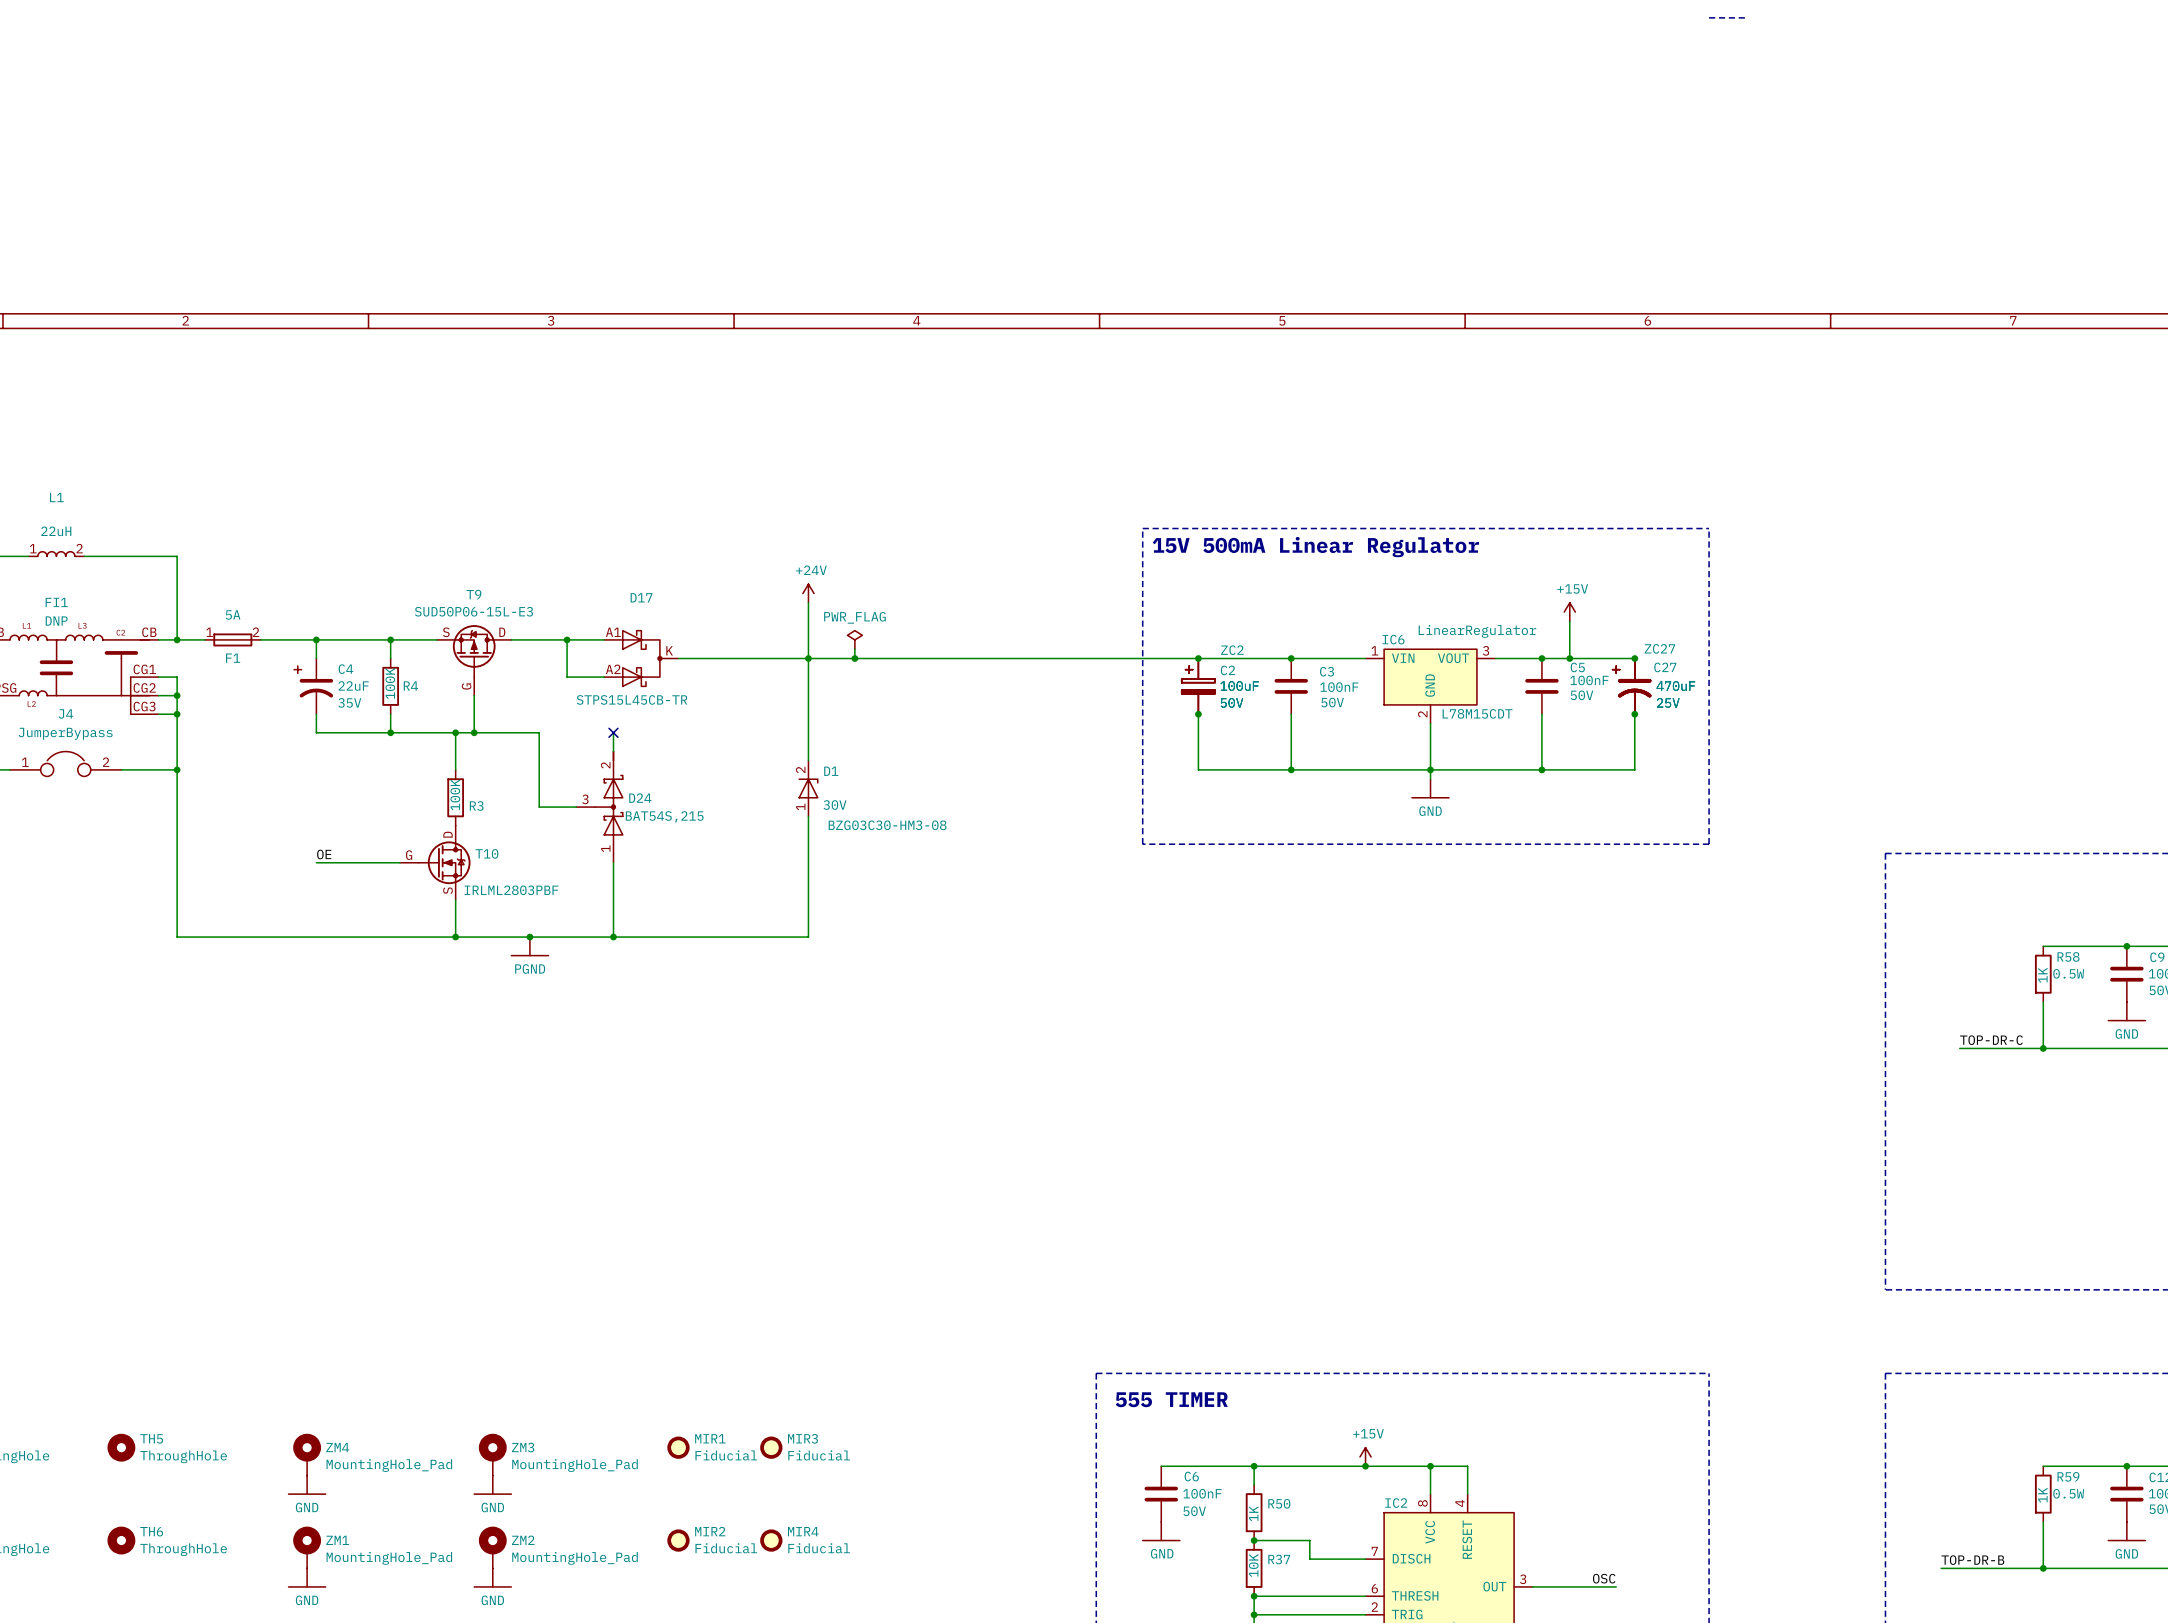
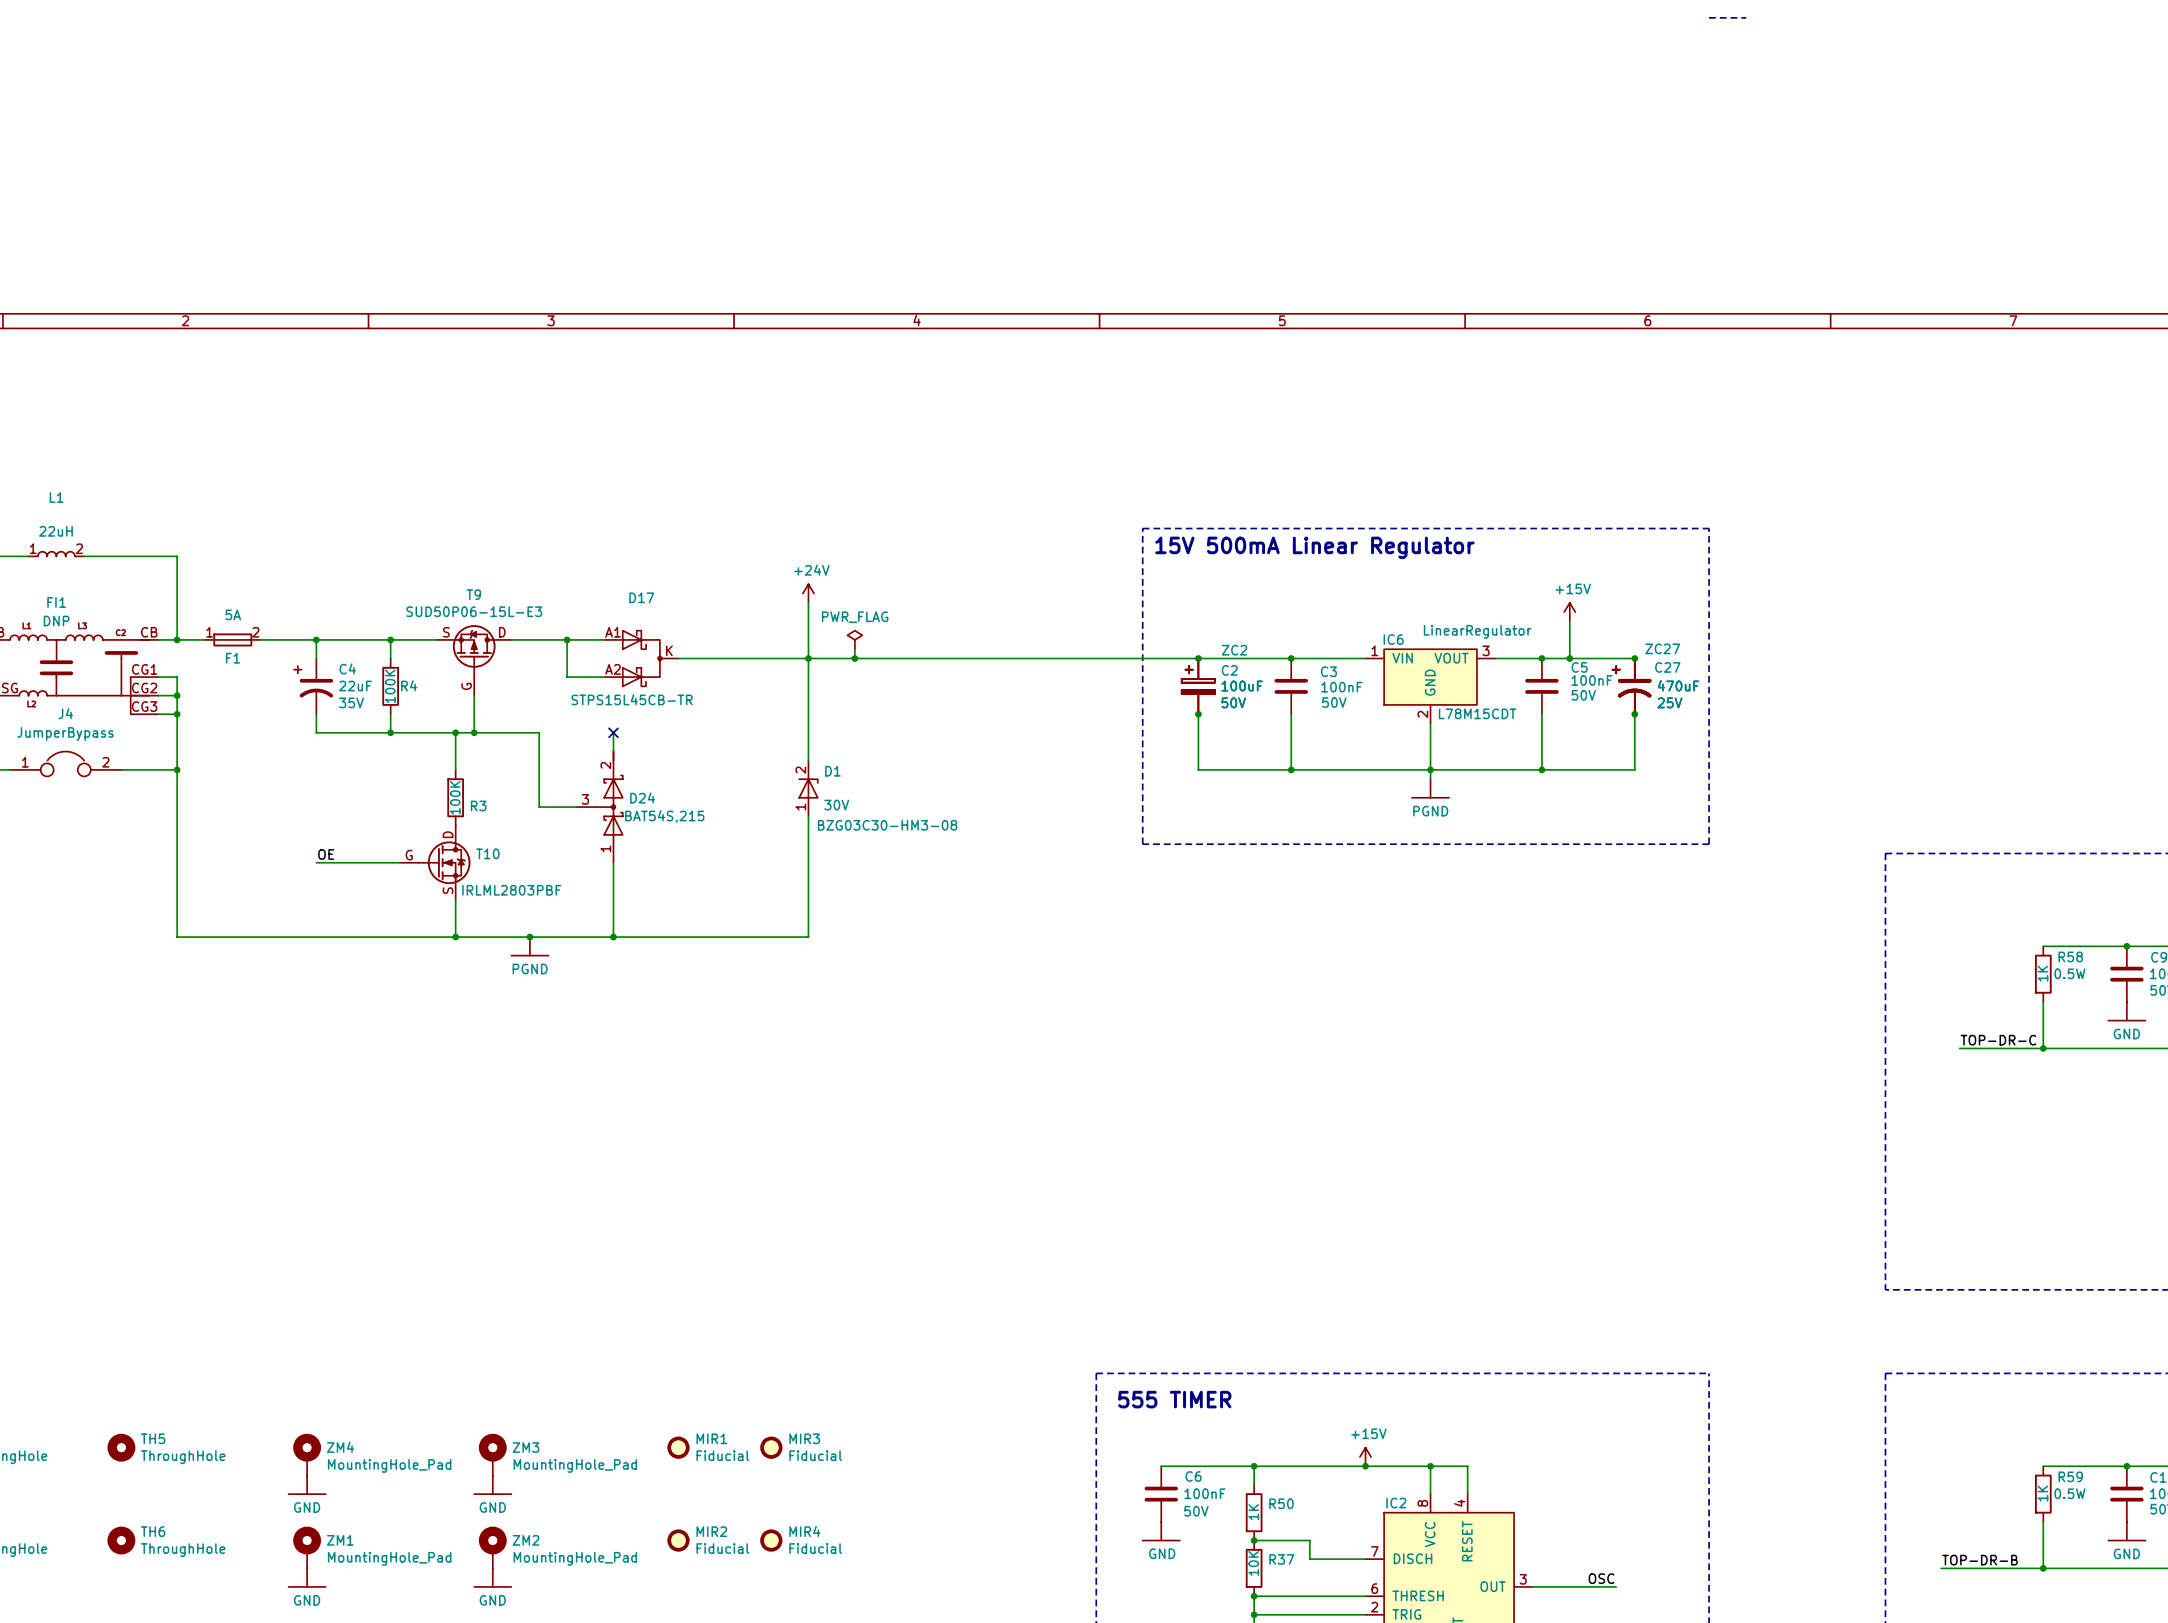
power symbol: GND (1430, 788) -> PGND (1430, 788)

